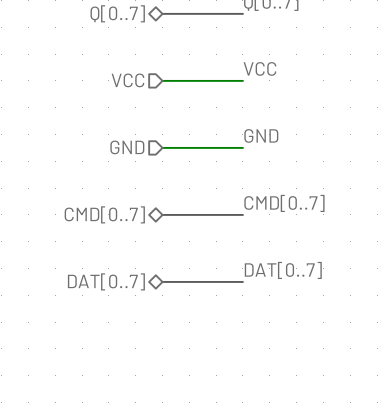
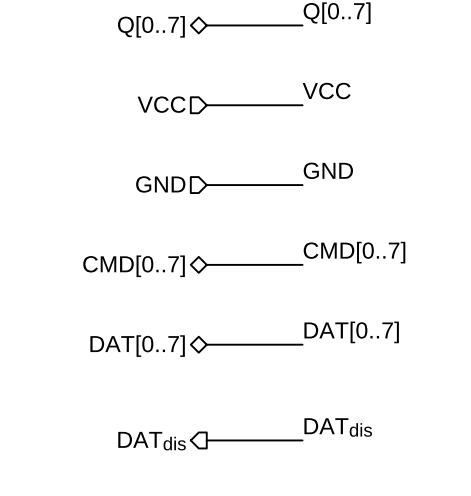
label: none -> DATdis (338, 427)
hierarchical label: none -> DATdis (152, 441)
wire: none -> (206, 440) (302, 440)

